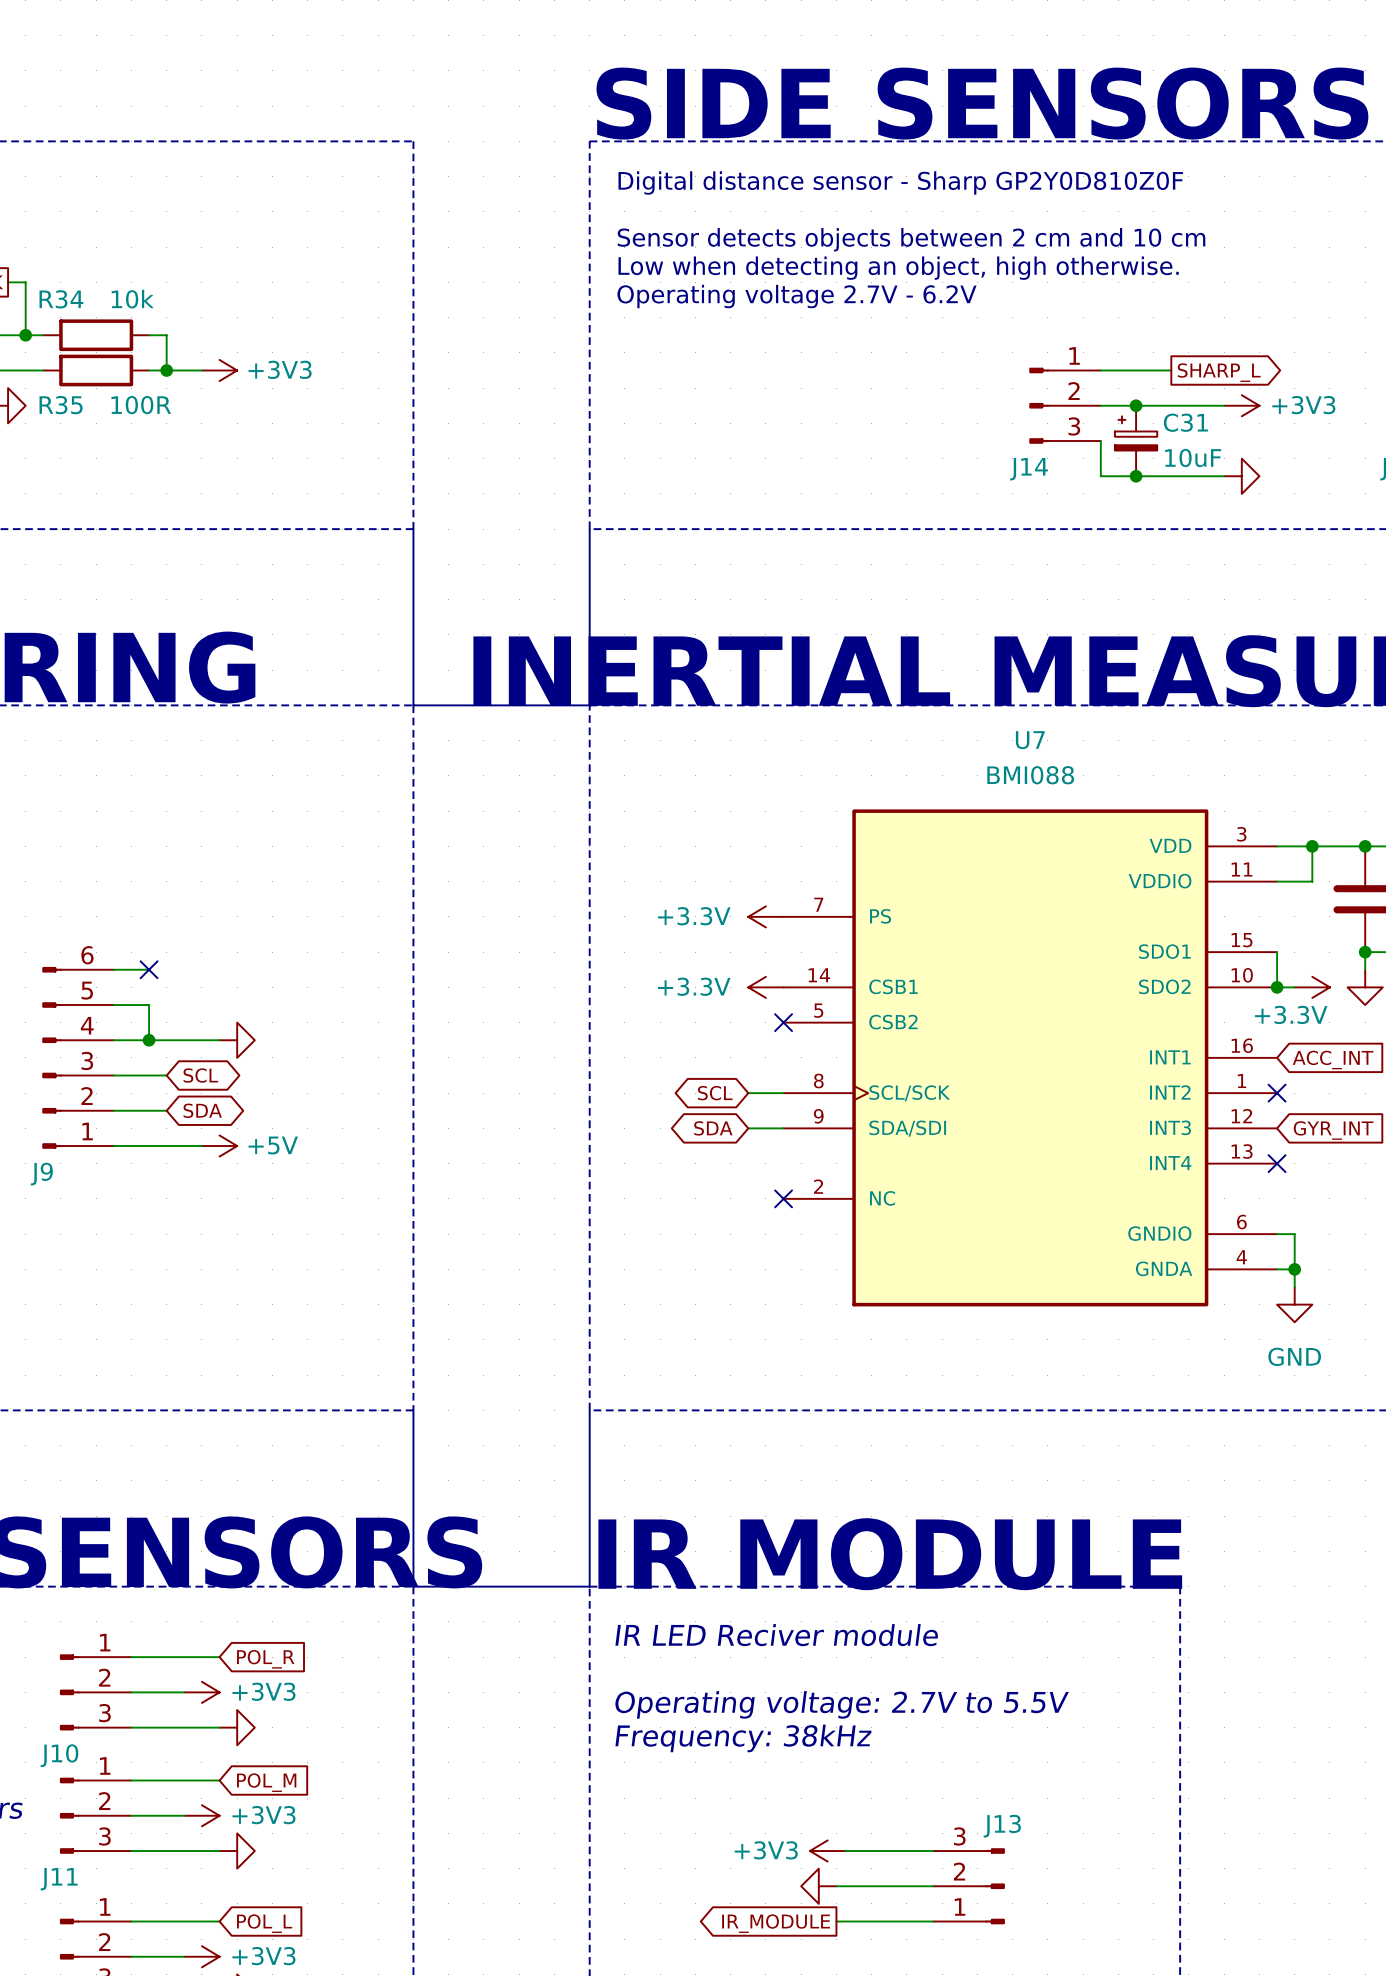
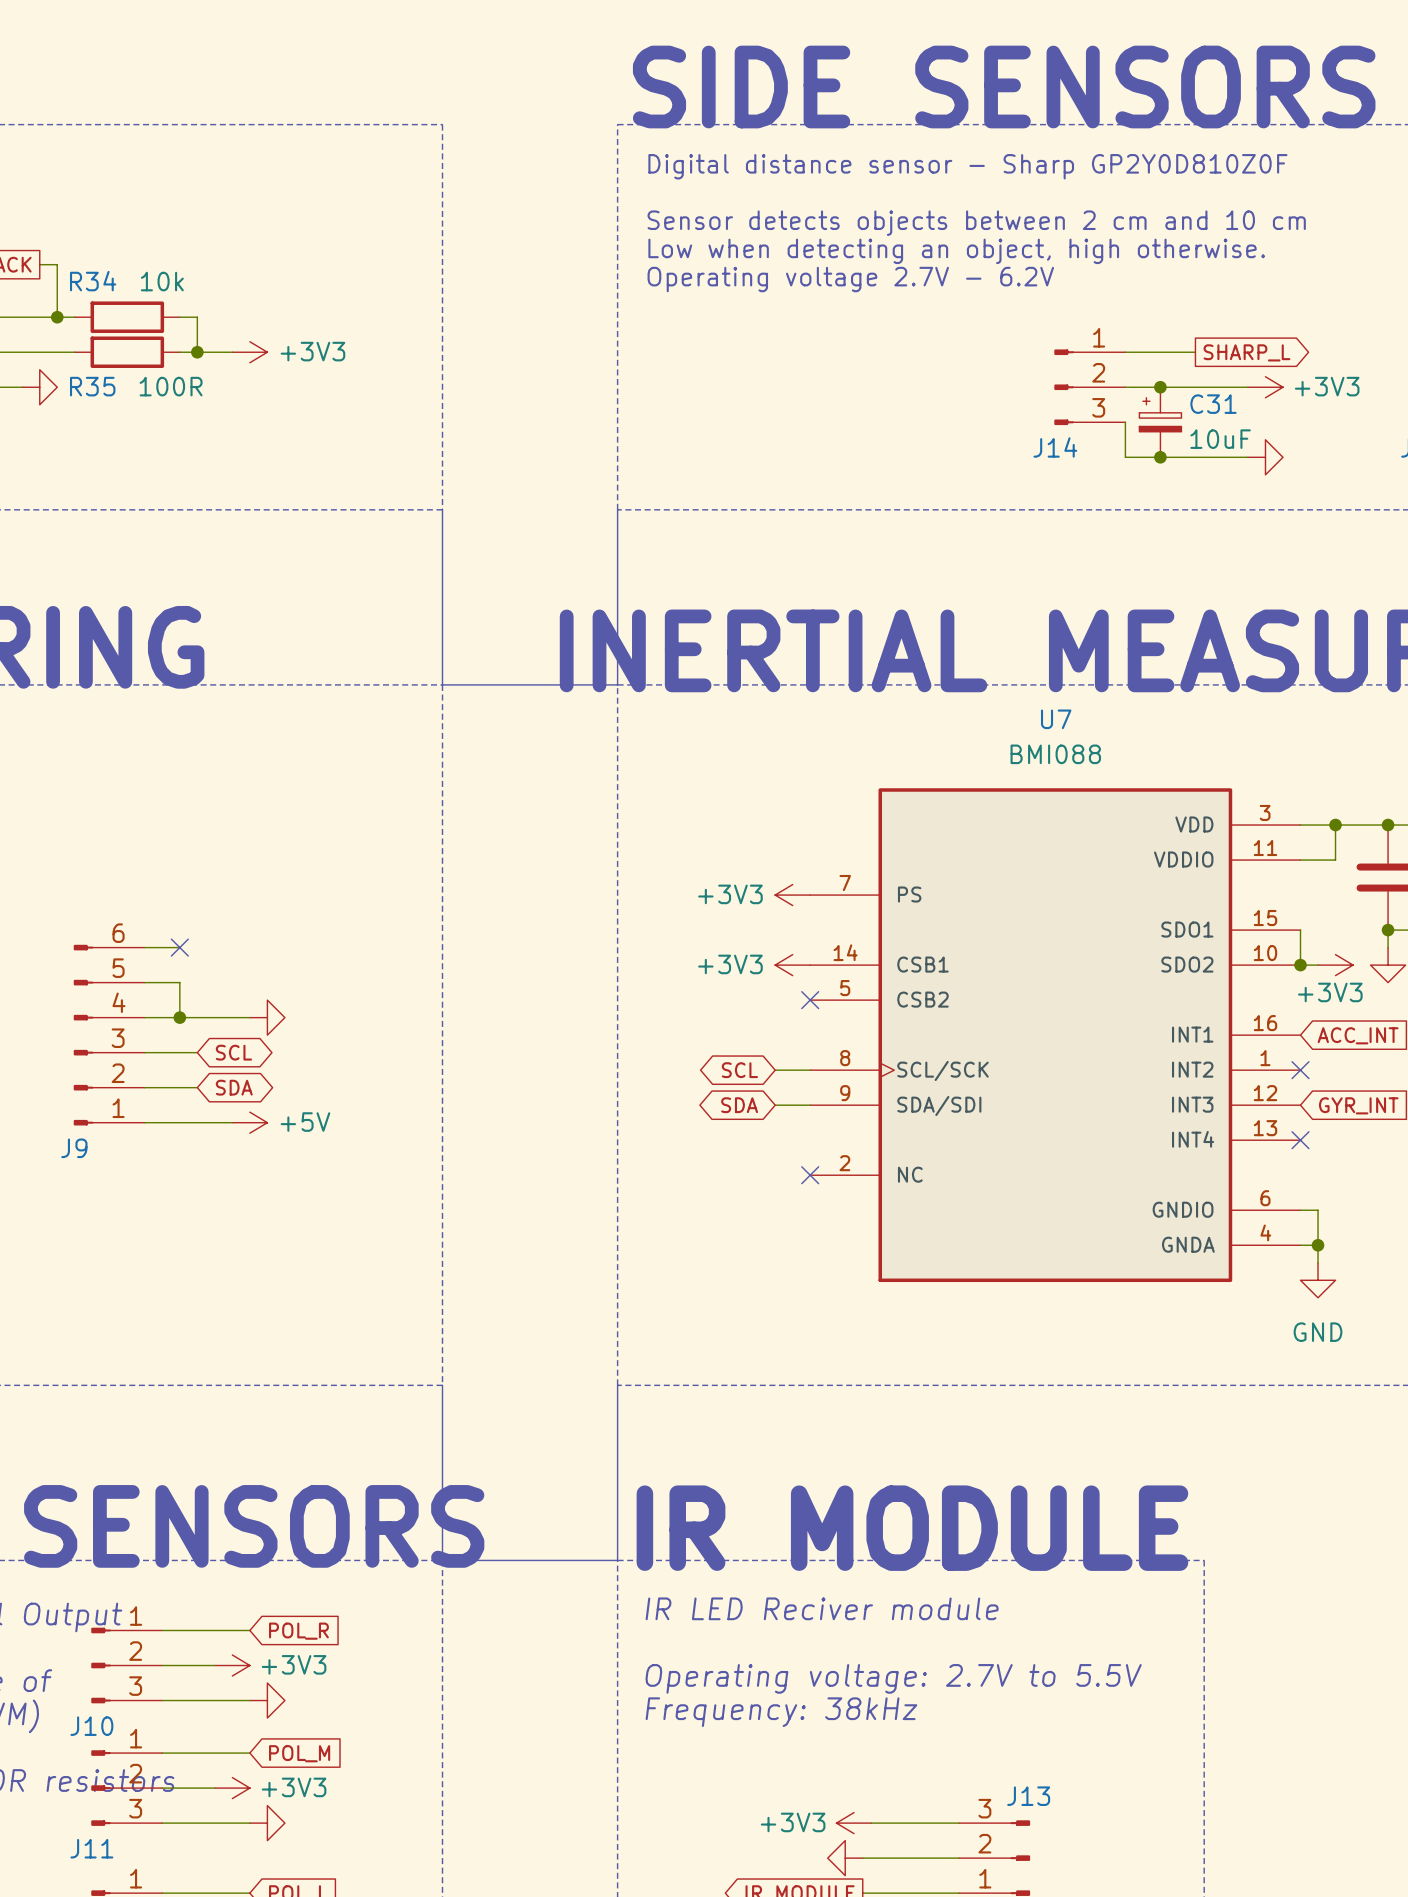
power symbol: +3.3V (765, 916) -> +3V3 (792, 895)
power symbol: +3.3V (765, 987) -> +3V3 (792, 965)
power symbol: +3.3V (1312, 987) -> +3V3 (1335, 965)

